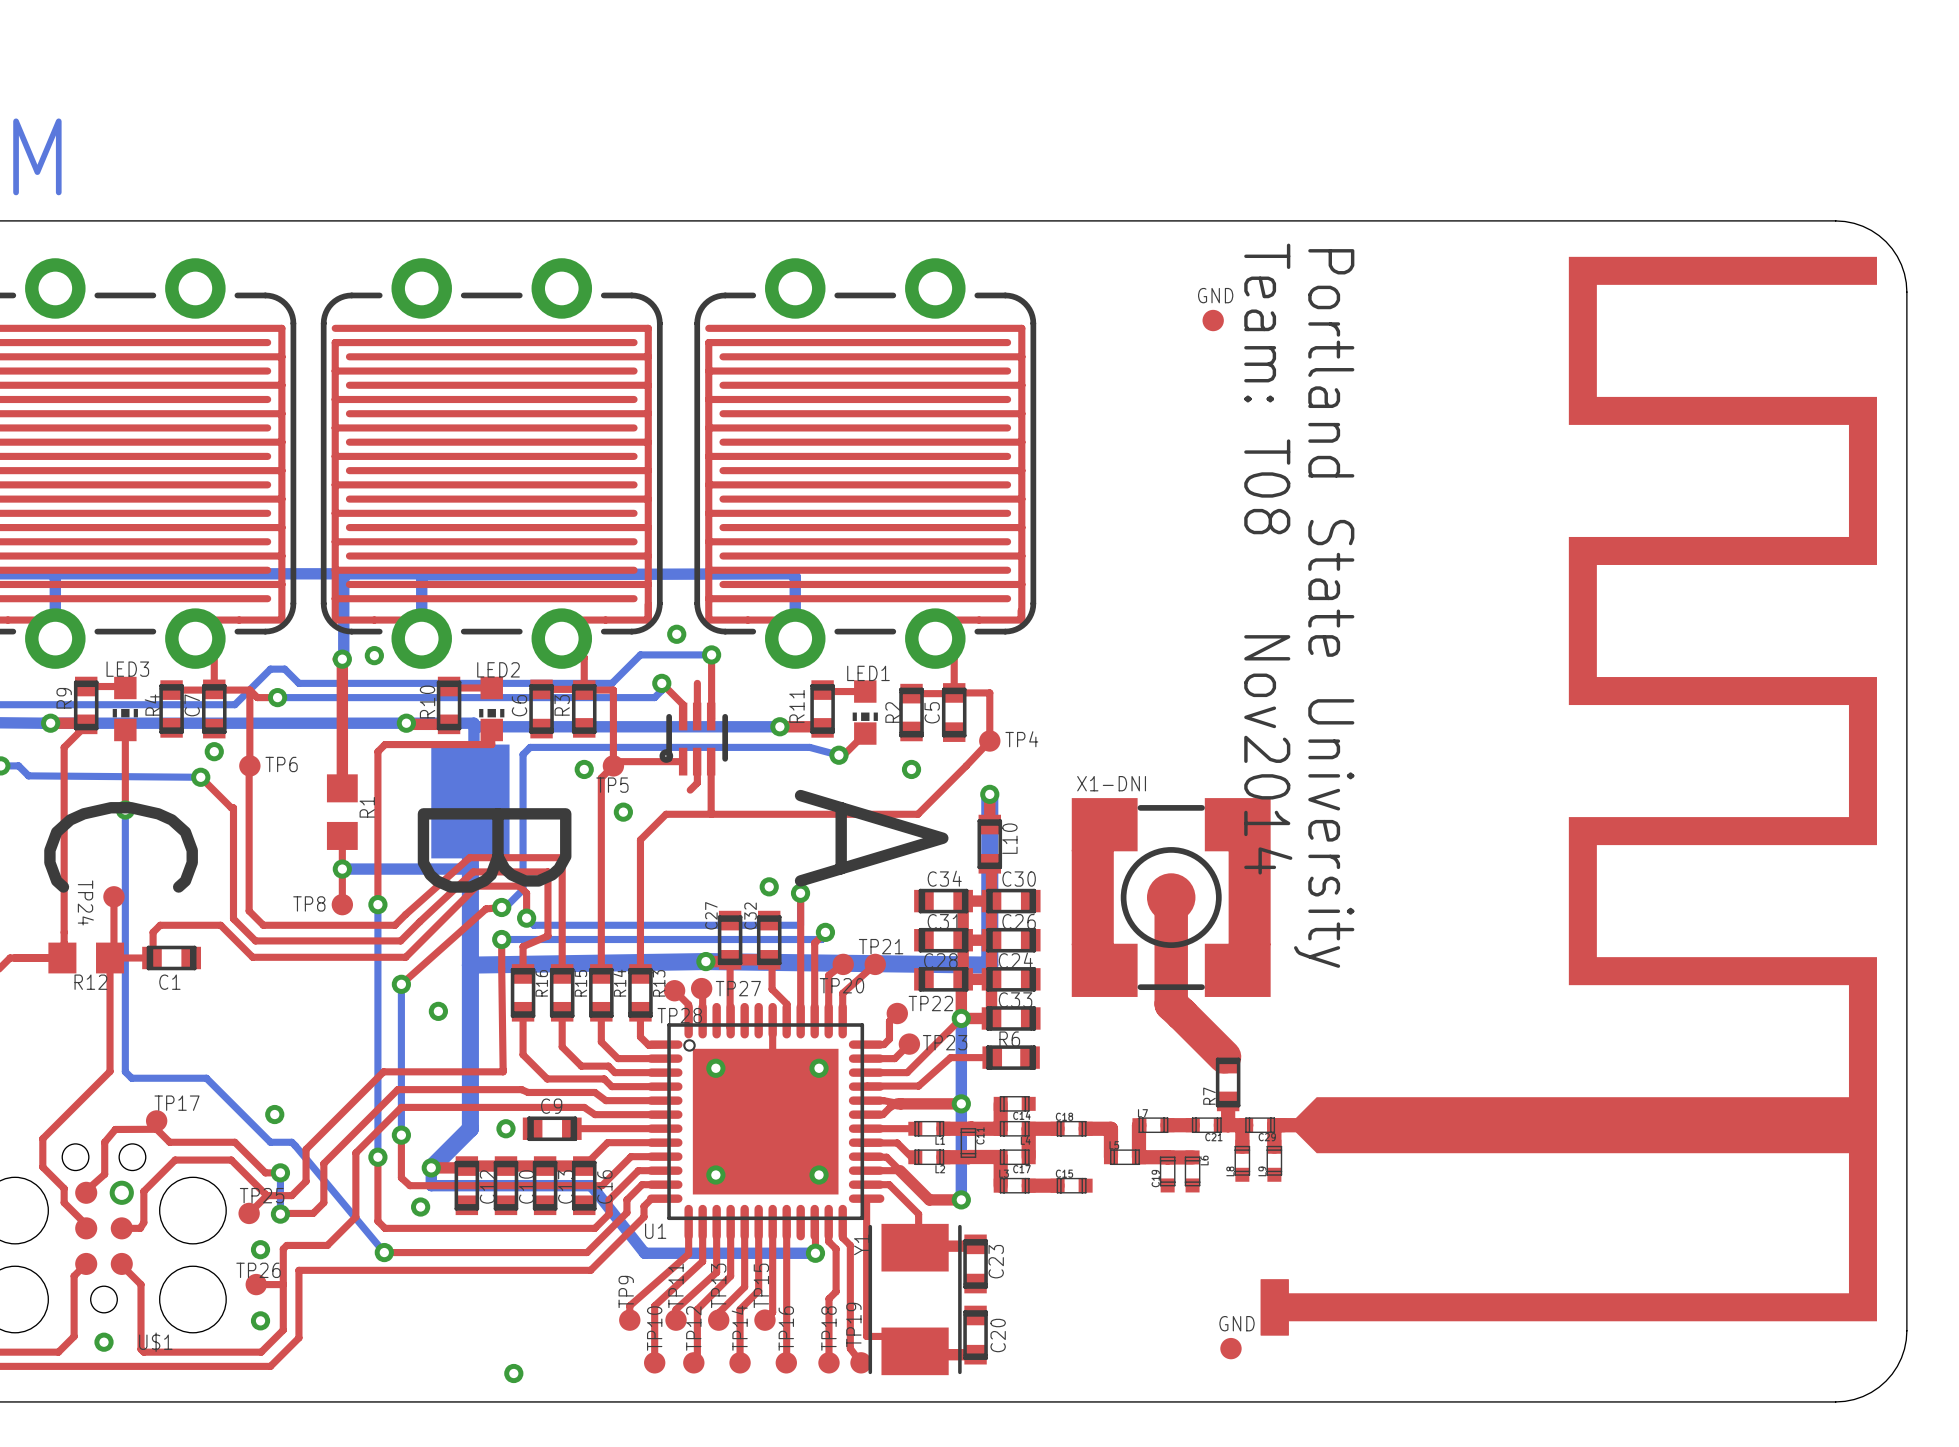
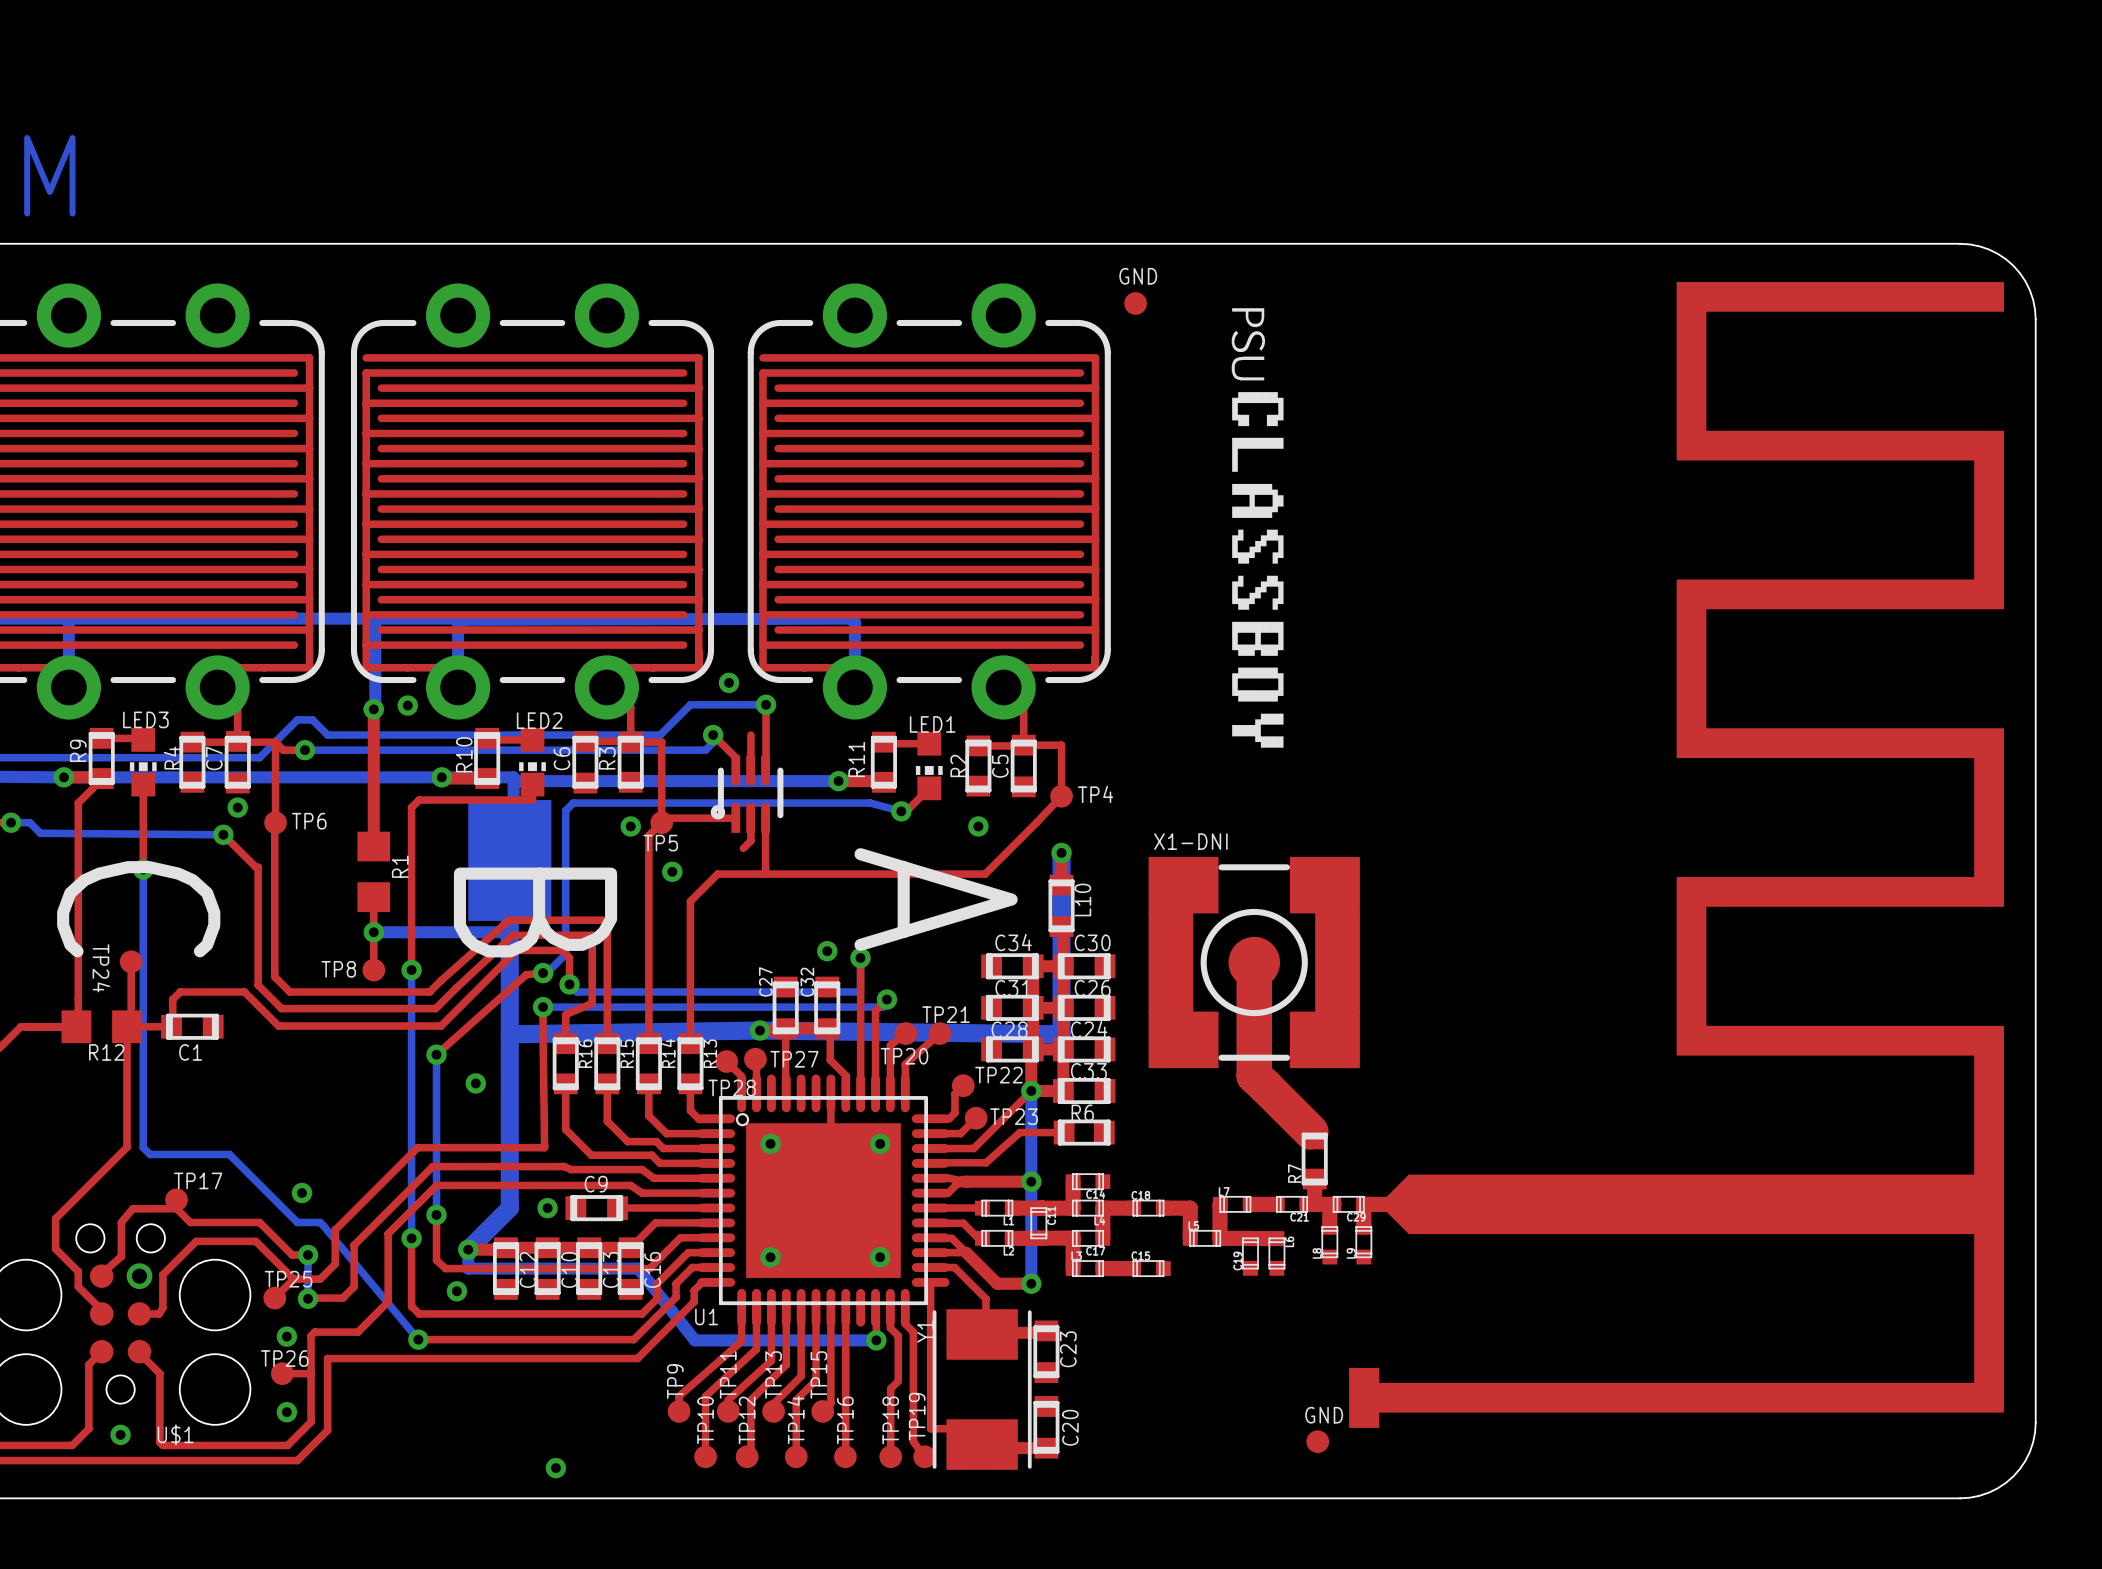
drawing: none -> [1231, 308, 1284, 748]
text position: GND (1215, 295) -> GND (1138, 276)
part position: (1213, 320) -> (1135, 303)
text: Team: T08 Nov2014 (1268, 559) -> none
text: Portland State University (1324, 608) -> none

